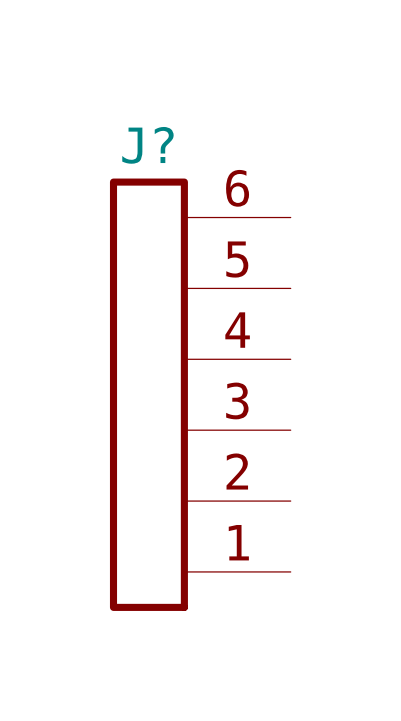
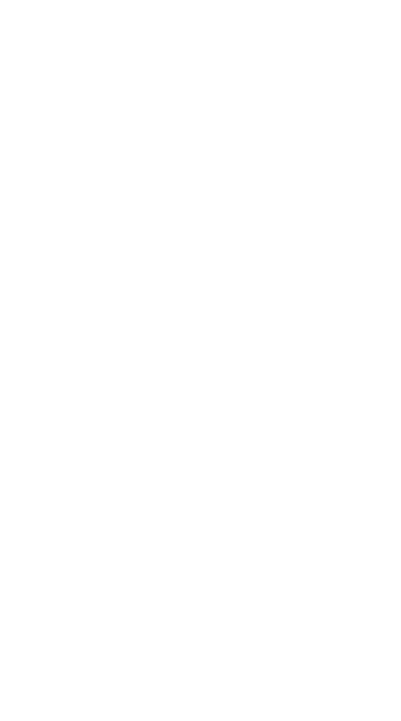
J?: (200, 394) -> none

